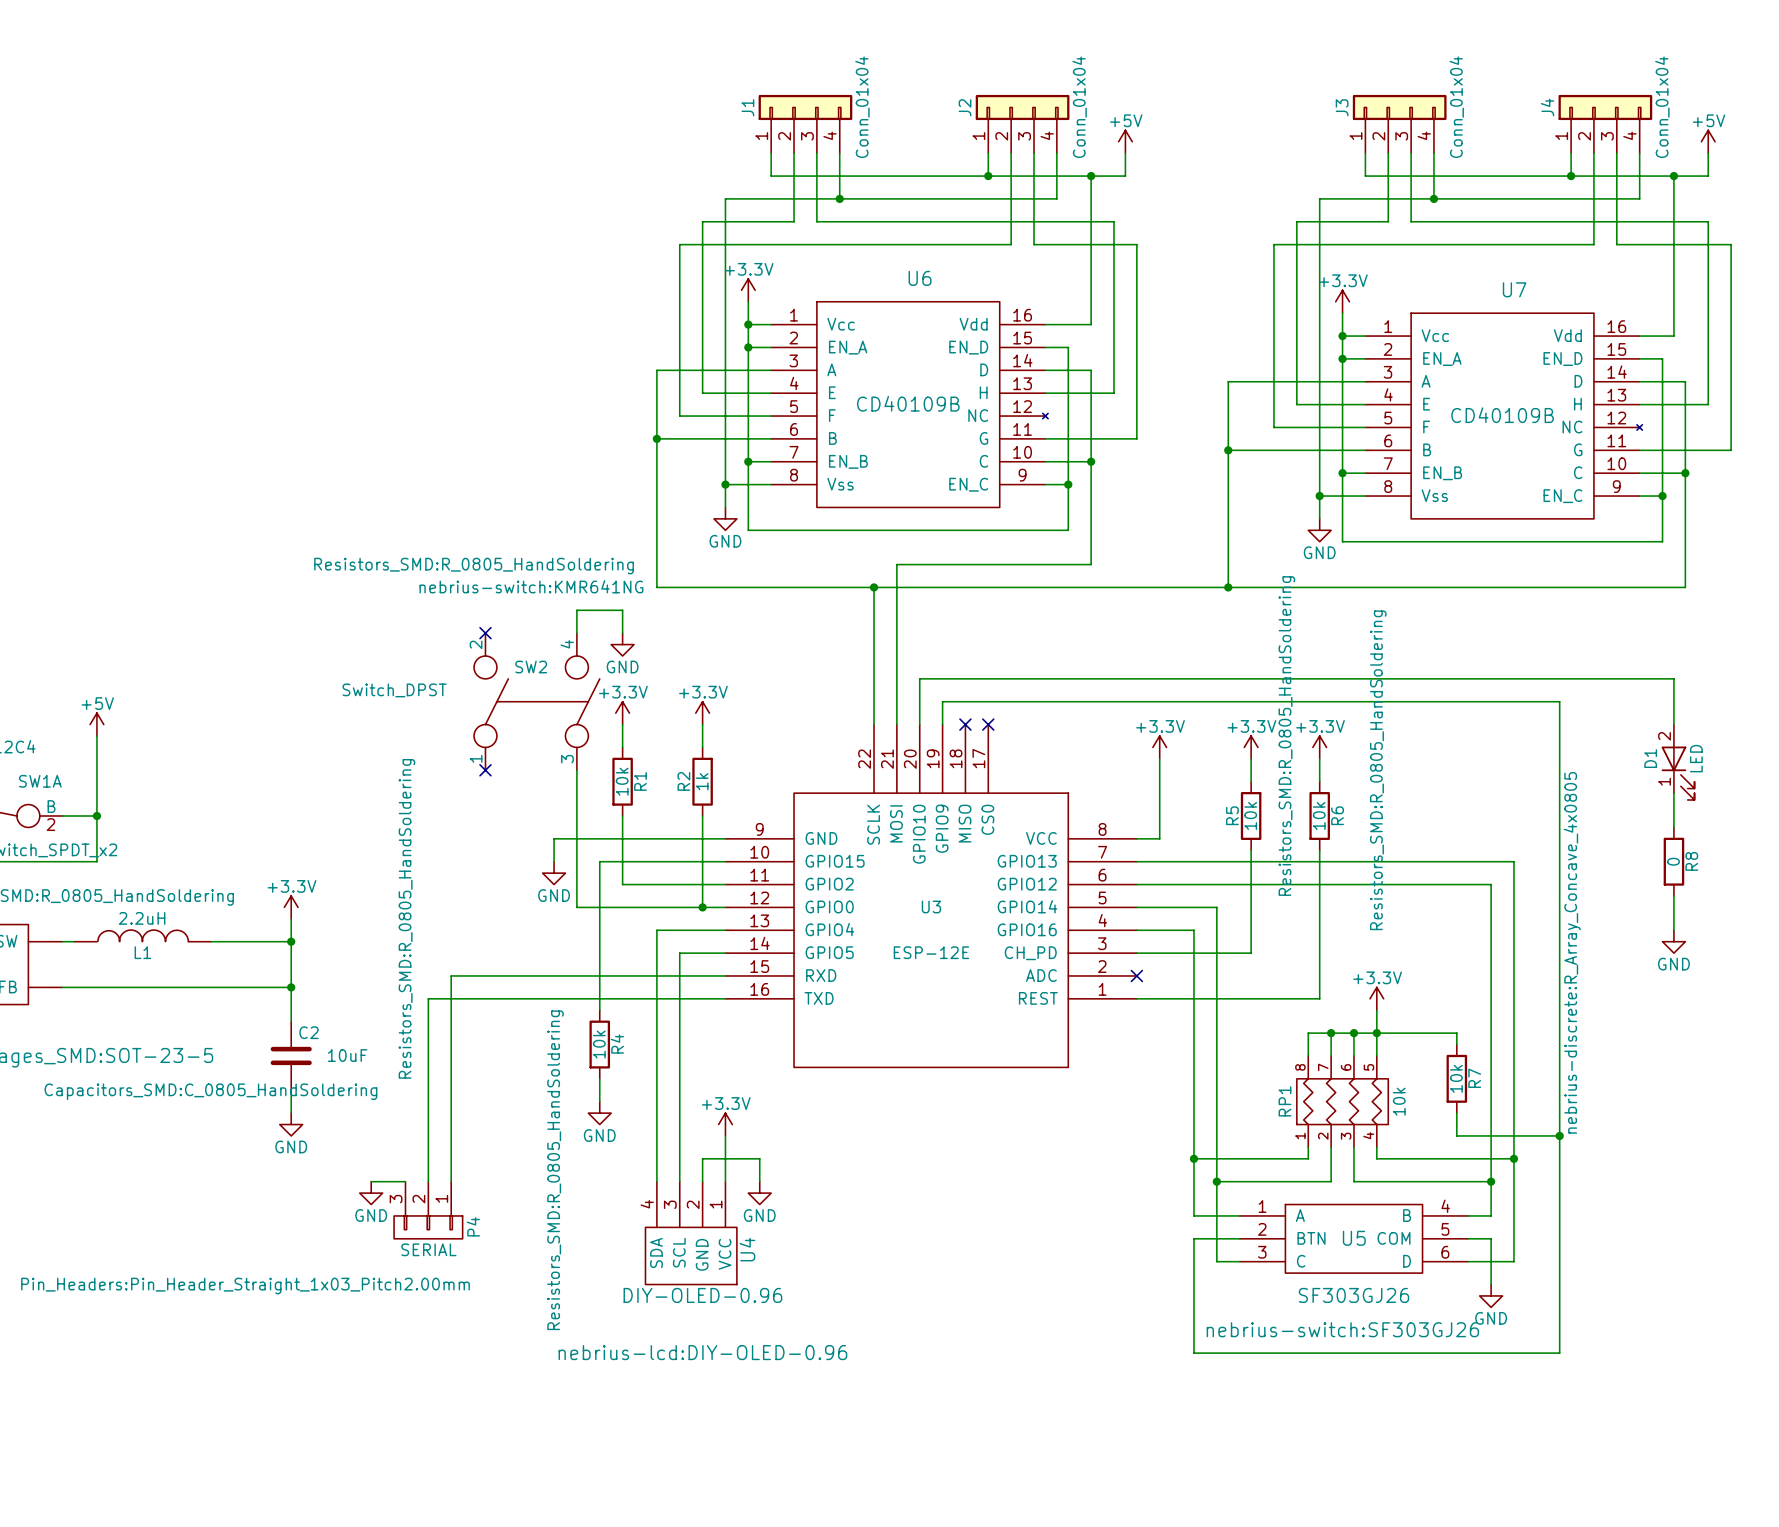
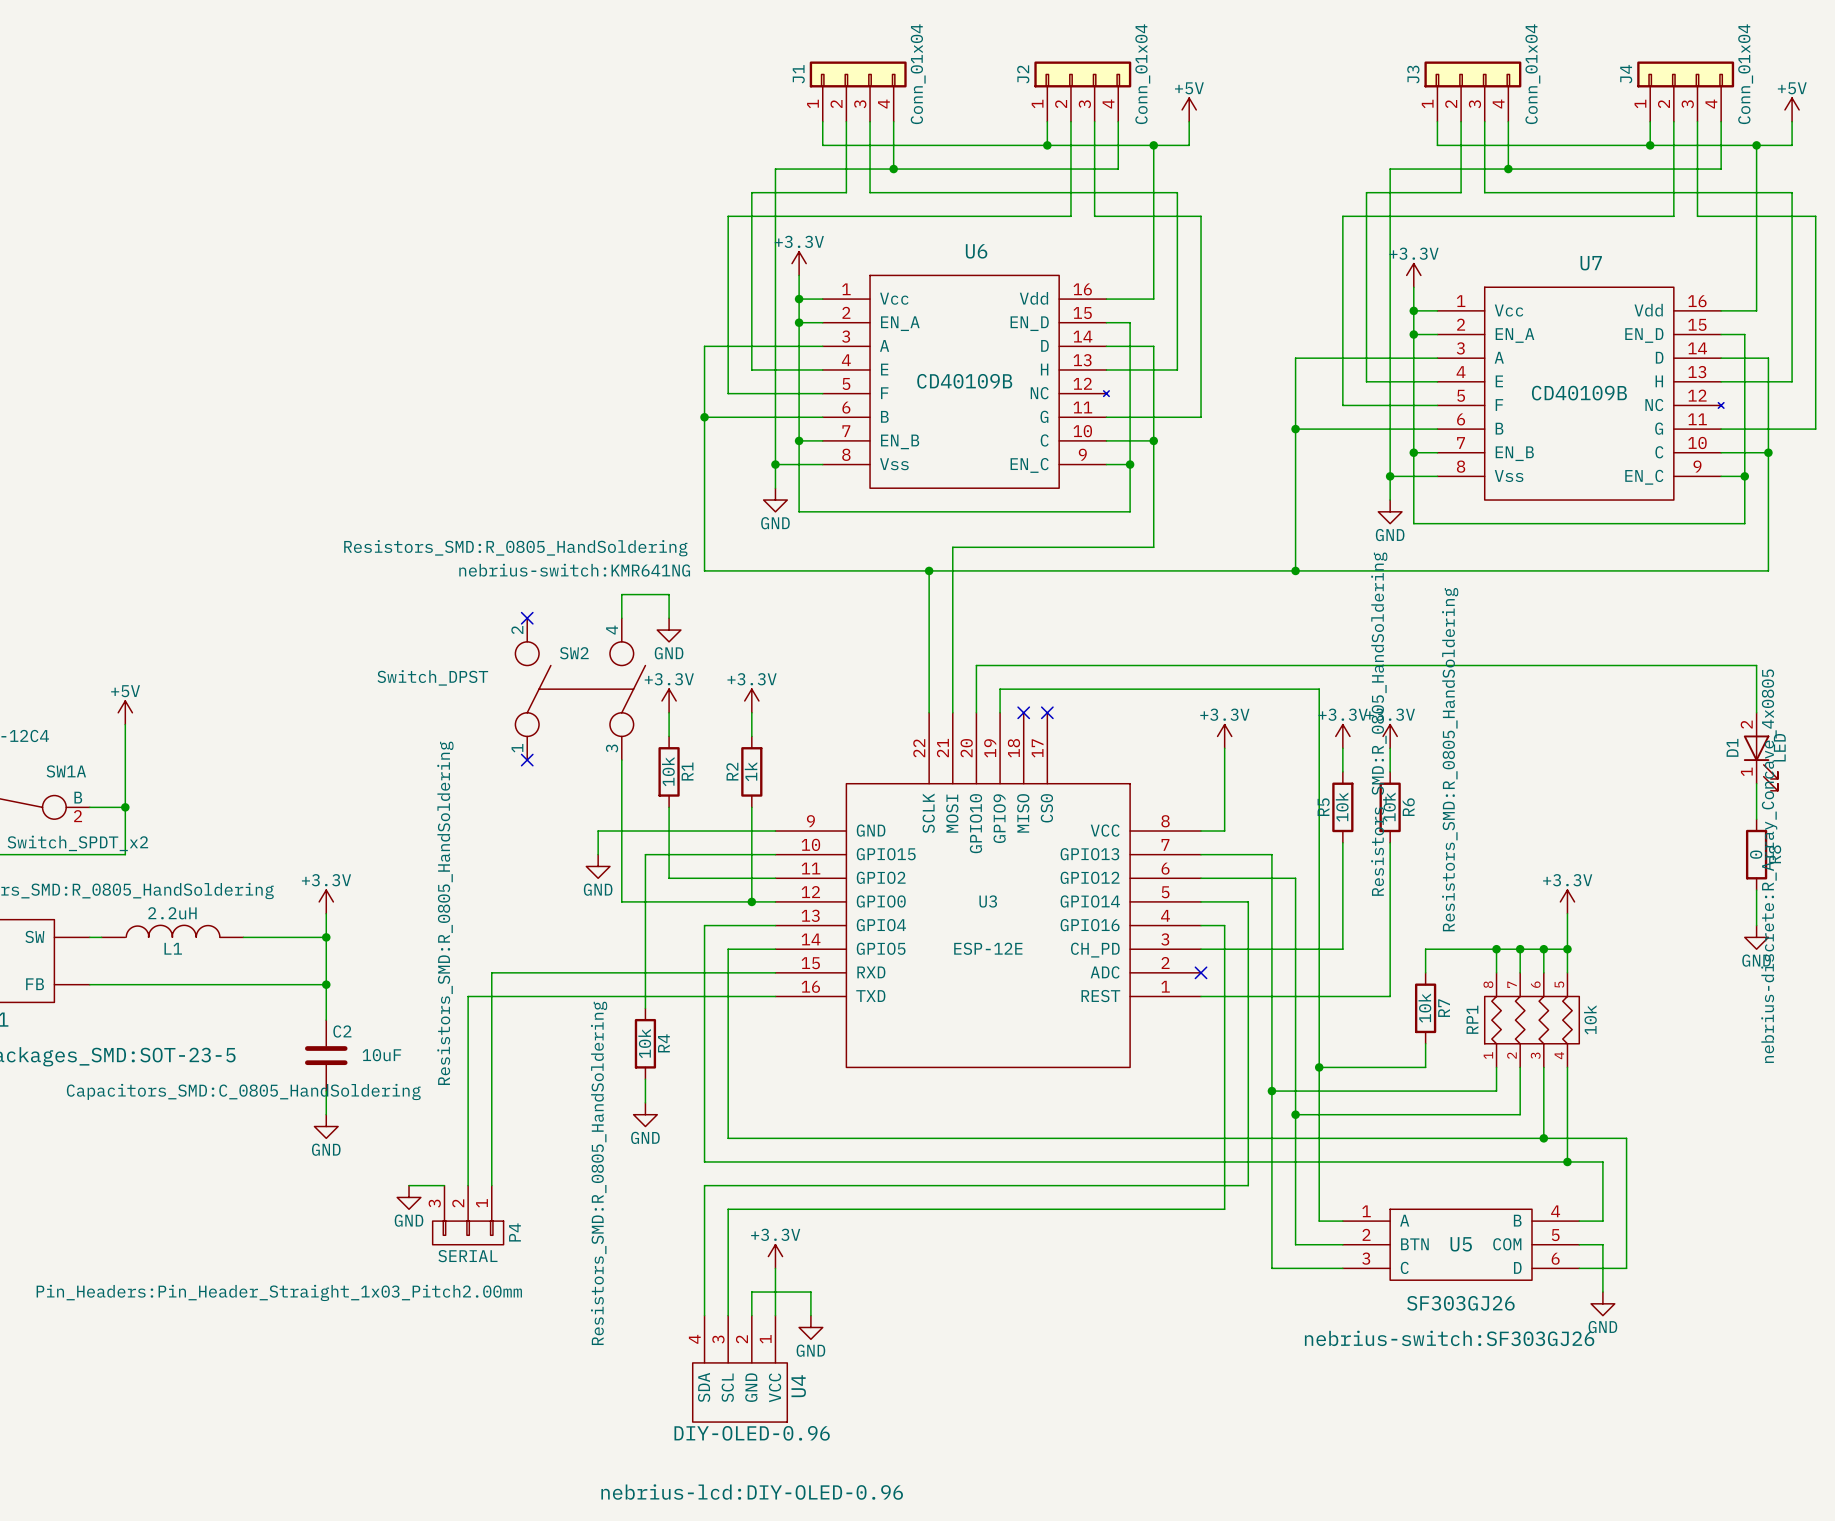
wire: (1251, 701) (1559, 701) (1559, 1353) (1193, 1353) (1193, 1238) (1228, 1238) -> (1295, 878) (1295, 1244)
wire: none -> (1319, 689) (1319, 748)
power symbol position: +3.3V (1251, 747) -> +3.3V (1342, 736)
wire: none -> (1342, 748) (1342, 771)
wire: none -> (1319, 771) (1319, 842)
R5 position: (1251, 816) -> (1342, 807)
wire: none -> (1342, 842) (1342, 949) (1319, 949) (1319, 1221) (1342, 1221)
wire: (1205, 861) (1513, 861) (1513, 1261) -> none
wire: (1228, 884) (1491, 884) (1491, 918) -> none
wire: (1182, 907) (1216, 907) (1216, 1261) -> (1271, 854) (1271, 1268) (1283, 1268)
wire: none -> (1248, 901) (1248, 1185) (704, 1185) (704, 1315)
power symbol: none -> +3.3V (1567, 901)
wire: (1159, 930) (1193, 930) (1193, 1215) (1239, 1215) -> (1224, 925) (1224, 1209) (728, 1209) (728, 1315)
junction: none -> (1496, 949)
wire: none -> (1520, 949) (1520, 972)
junction: none -> (1520, 949)
wire: none -> (1543, 949) (1543, 972)
junction: none -> (1543, 949)
wire: none -> (1567, 949) (1425, 949) (1425, 972)
junction: none -> (1567, 949)
power symbol: +3.3V (1376, 998) -> none
wire: (1376, 1010) (1376, 1055) -> none
wire: (1331, 1033) (1331, 1055) -> (1496, 949) (1496, 972)
junction: (1331, 1033) -> none
junction: (1353, 1033) -> none
junction: (1376, 1033) -> none
wire: (1456, 1044) (1456, 1033) (1308, 1033) (1308, 1055) -> none
wire: none -> (1425, 1055) (1425, 1067) (1319, 1067)
junction: none -> (1319, 1067)
wire: none -> (1496, 1067) (1496, 1091) (1271, 1091)
wire: none -> (1520, 1067) (1520, 1114) (1295, 1114)
wire: none -> (1543, 1067) (1543, 1138)
R7 position: (1456, 1078) -> (1425, 1008)
junction: none -> (1271, 1091)
RP1 position: (1342, 1101) -> (1531, 1020)
junction: none -> (1295, 1114)
wire: (1456, 1113) (1456, 1135) -> (728, 1138) (1531, 1138)
power symbol position: +3.3V (725, 1124) -> +3.3V (775, 1256)
wire: (679, 1135) (679, 1181) -> none
wire: (725, 1135) (725, 1181) -> (775, 1268) (775, 1315)
junction: none -> (1543, 1138)
wire: (1548, 1135) (1559, 1135) -> (1626, 1138) (1626, 1268) (1591, 1268)
junction: (1559, 1135) -> none
wire: (1308, 1147) (1308, 1158) -> (1449, 1161) (1378, 1161)
wire: (1331, 1147) (1331, 1181) (1216, 1181) -> none
wire: (1353, 1147) (1353, 1181) (1491, 1181) -> none
wire: (1376, 1147) (1376, 1158) -> none
wire: (656, 1158) (656, 1181) -> (704, 1161) (751, 1161)
wire: (702, 1158) (702, 1181) -> none
wire: (759, 1158) (759, 1181) -> (810, 1161) (1260, 1161)
junction: (1193, 1158) -> none
wire: (1491, 1158) (1491, 1215) (1468, 1215) -> none
junction: none -> (1567, 1161)
wire: none -> (1591, 1161) (1602, 1161) (1602, 1221) (1579, 1221)
junction: (1513, 1158) -> none
junction: (1216, 1181) -> none
junction: (1491, 1181) -> none
power symbol position: GND (759, 1193) -> GND (810, 1327)
U4 position: (691, 1233) -> (740, 1368)
U5 position: (1353, 1238) -> (1461, 1244)
wire: (1468, 1238) (1491, 1238) (1491, 1284) -> (1579, 1244) (1602, 1244) (1602, 1292)
power symbol position: GND (1491, 1295) -> GND (1602, 1303)
wire: none -> (751, 1315) (751, 1292) (810, 1292) (810, 1315)

